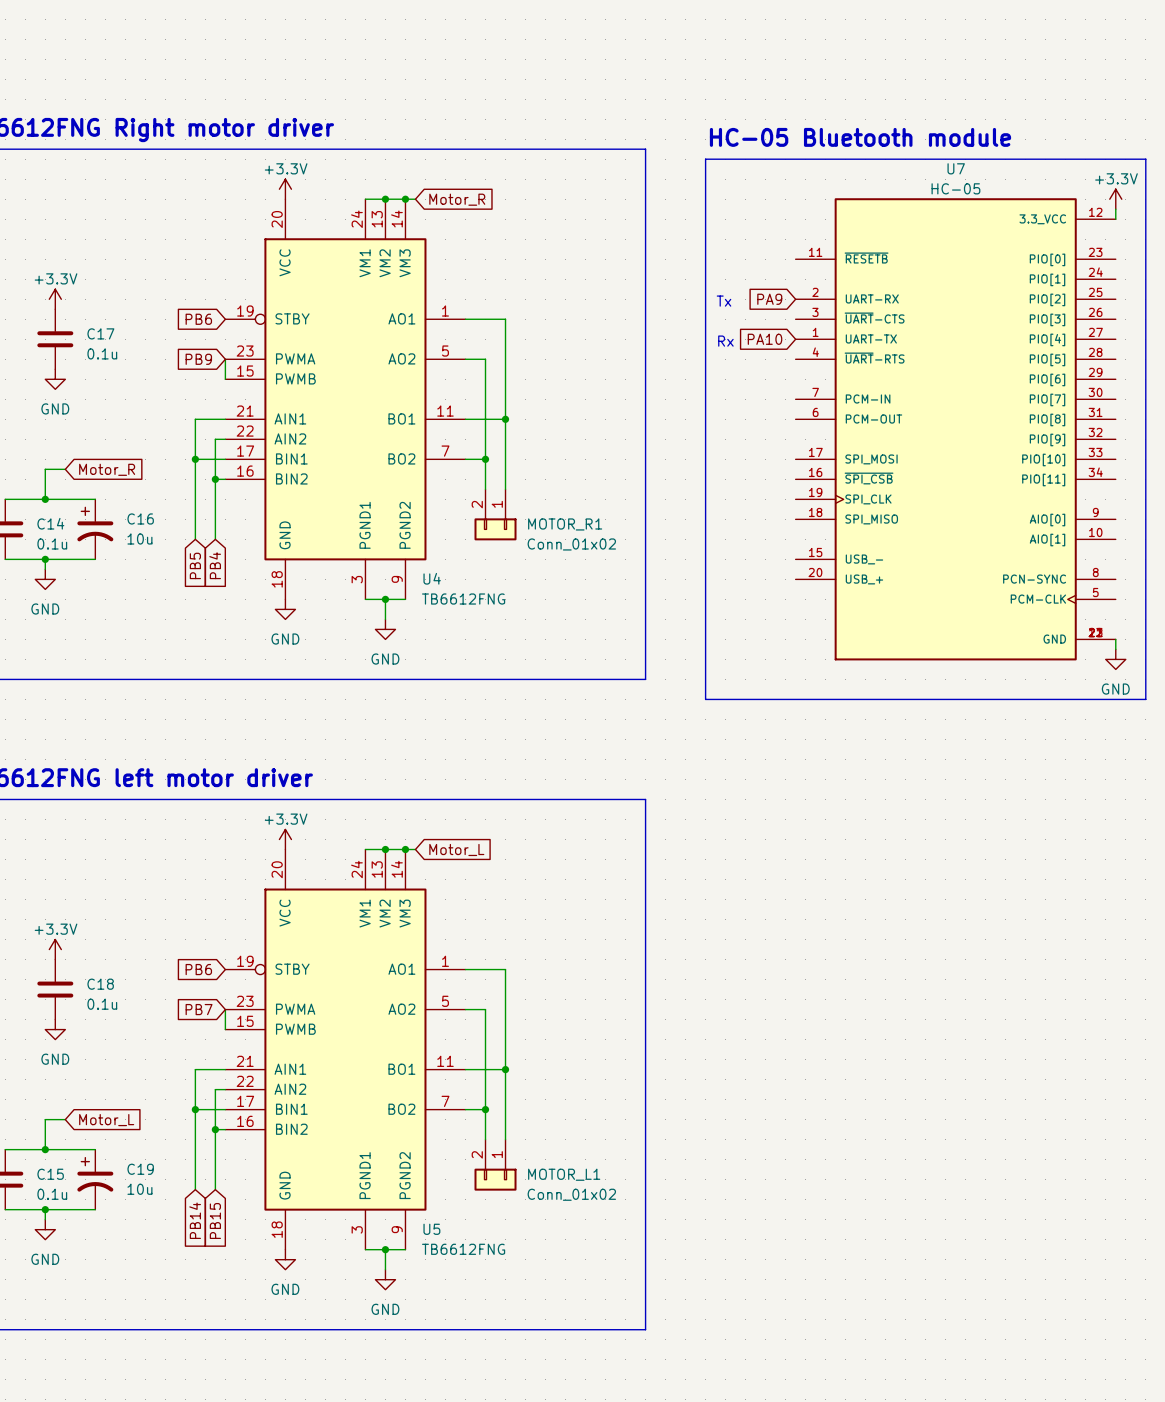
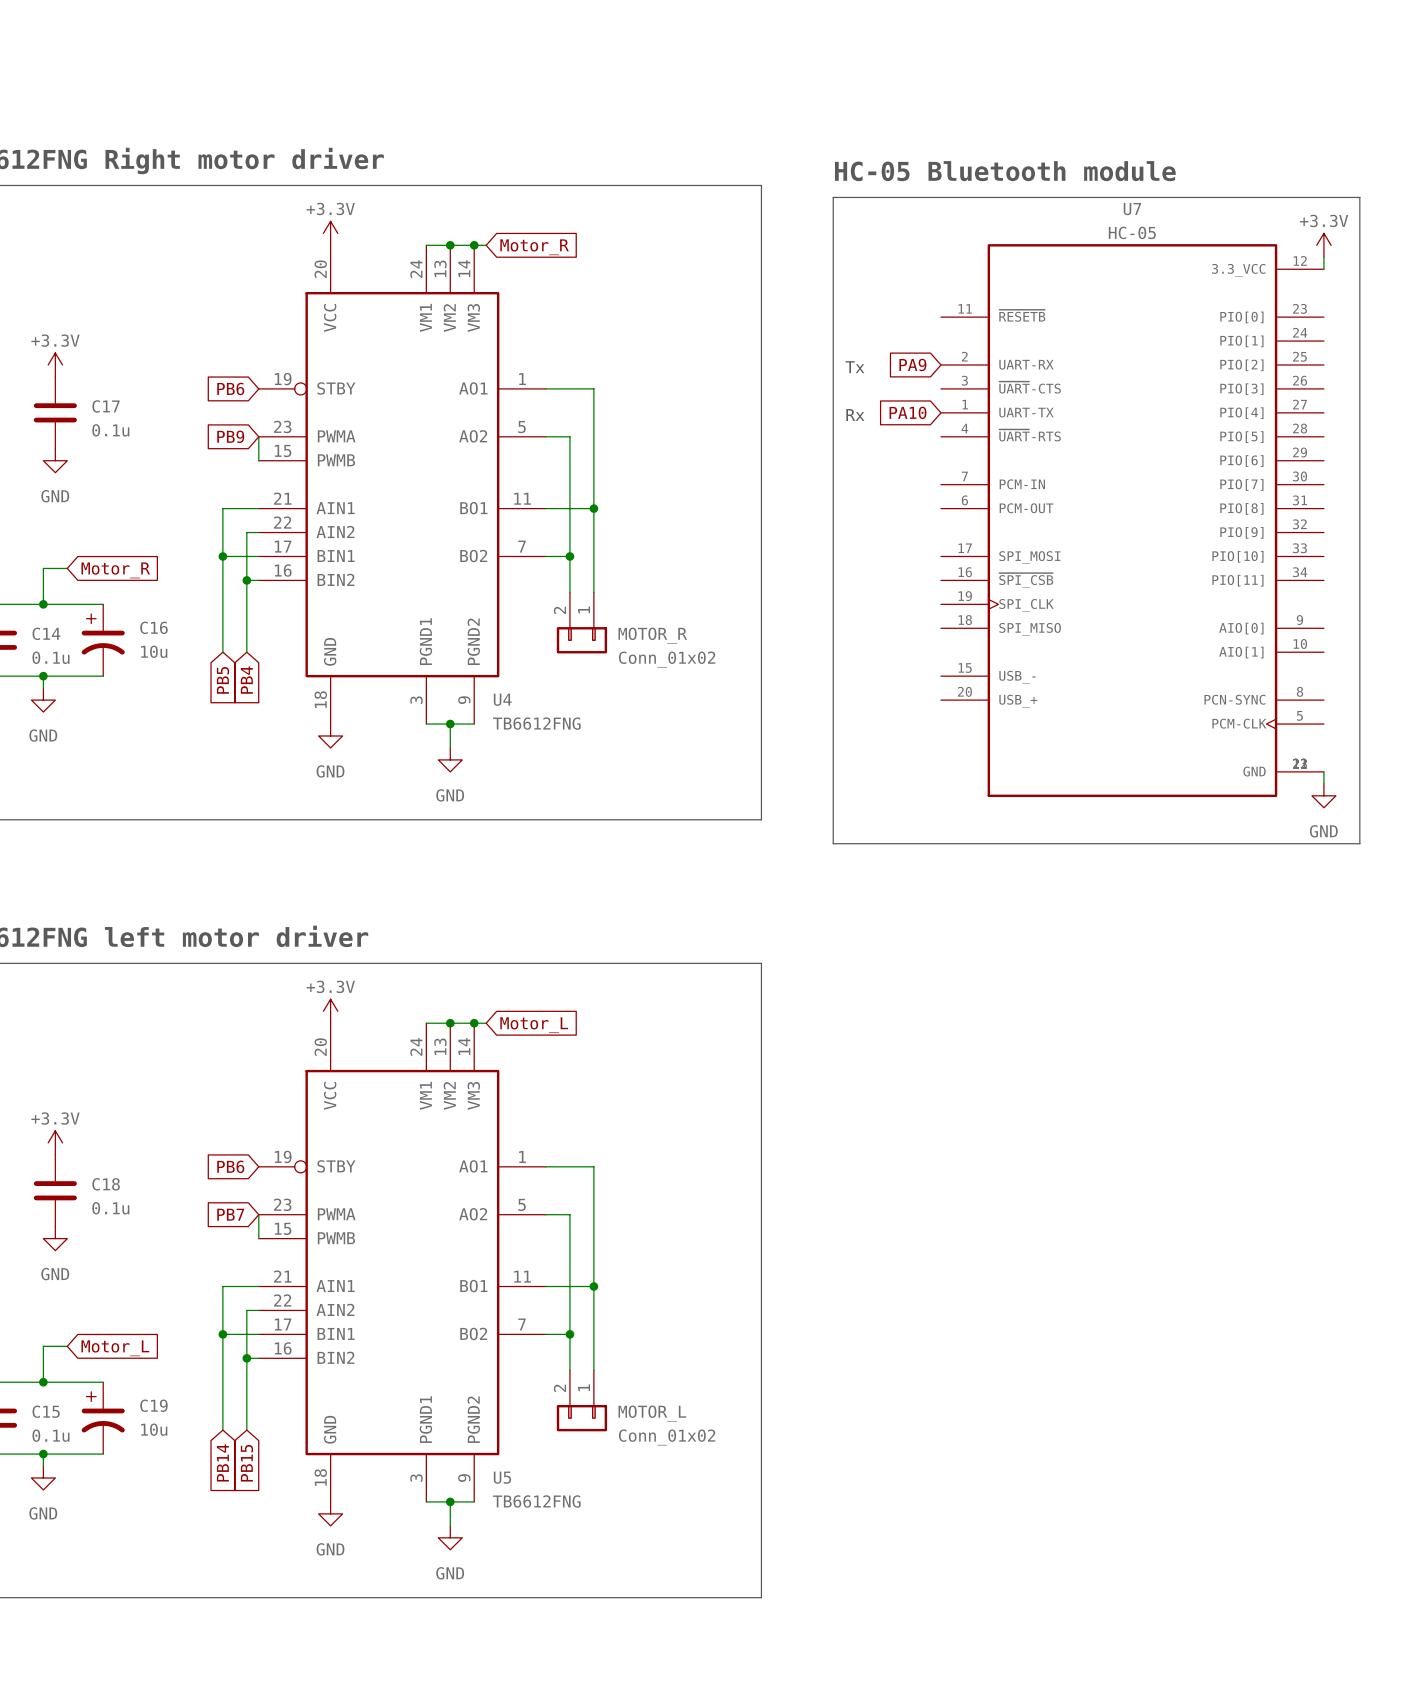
MOTOR_R1 name: MOTOR_R1 (565, 524) -> MOTOR_R (652, 635)
MOTOR_L1 name: MOTOR_L1 (564, 1174) -> MOTOR_L (652, 1413)

